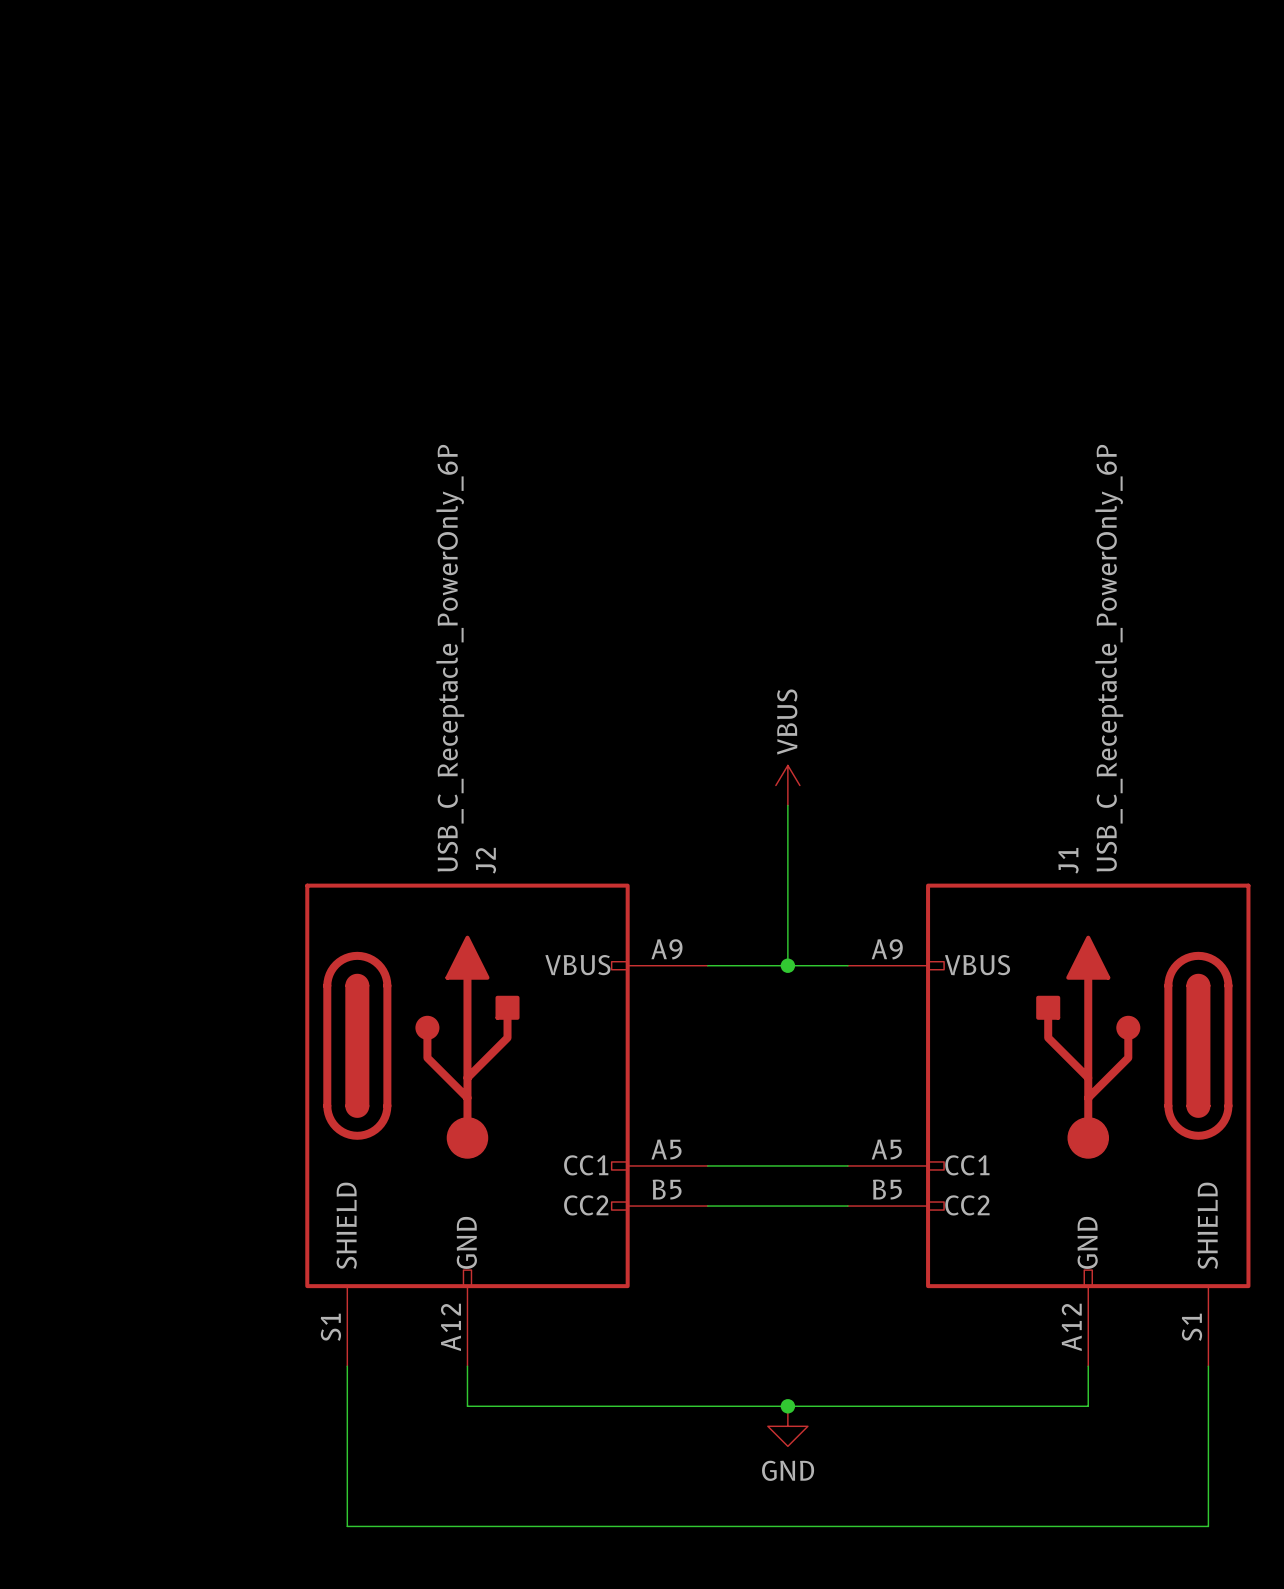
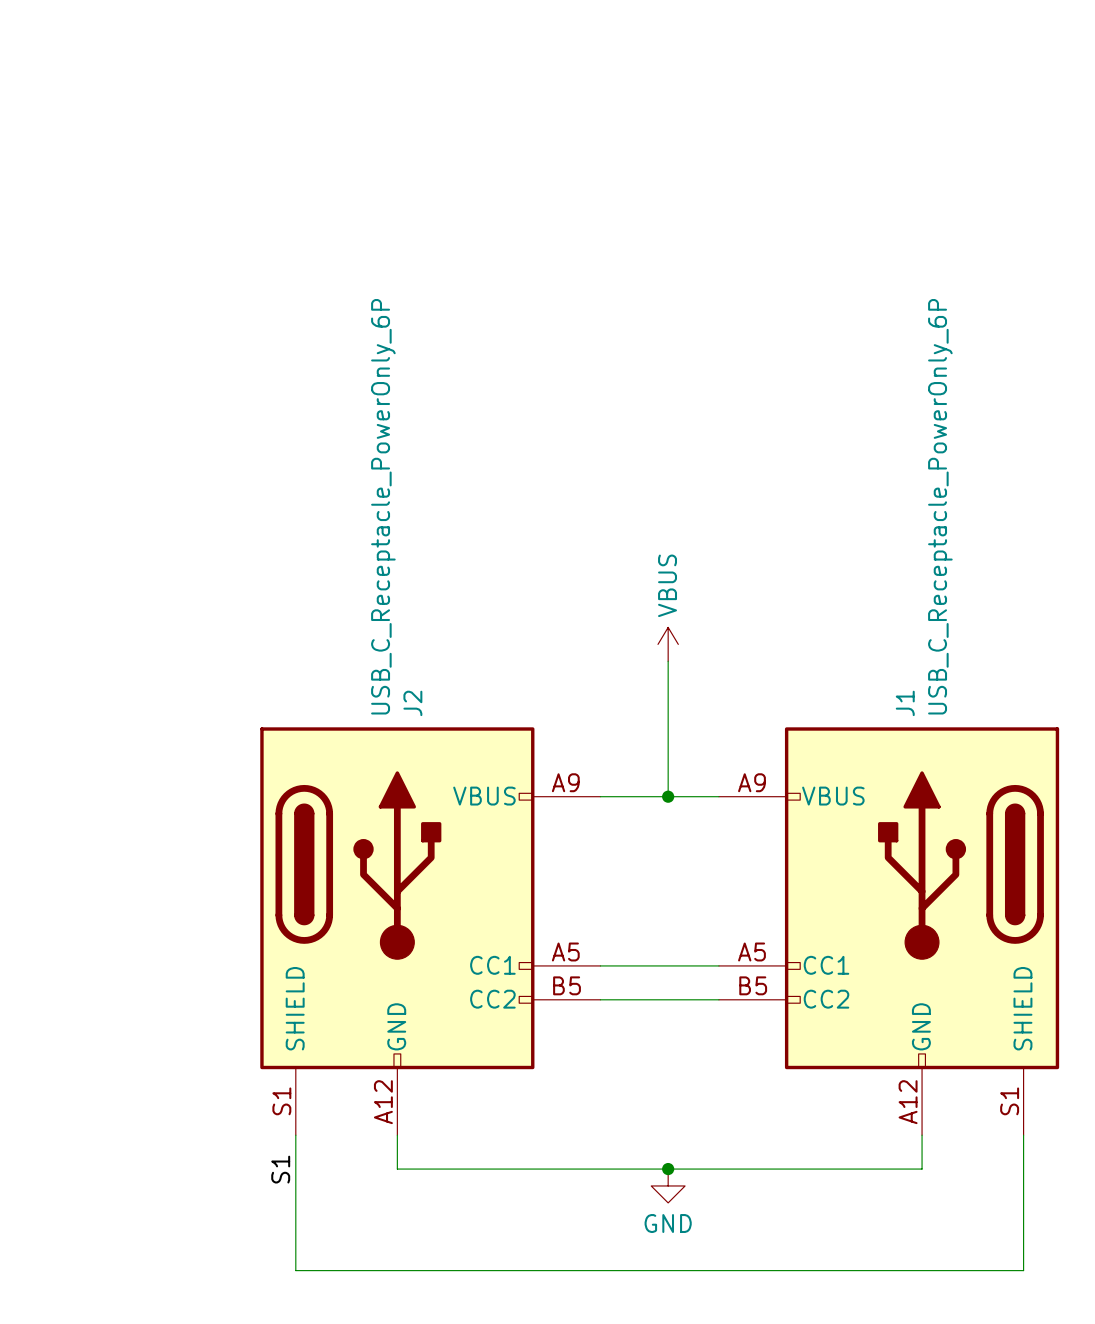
label: none -> S1 (280, 1169)

